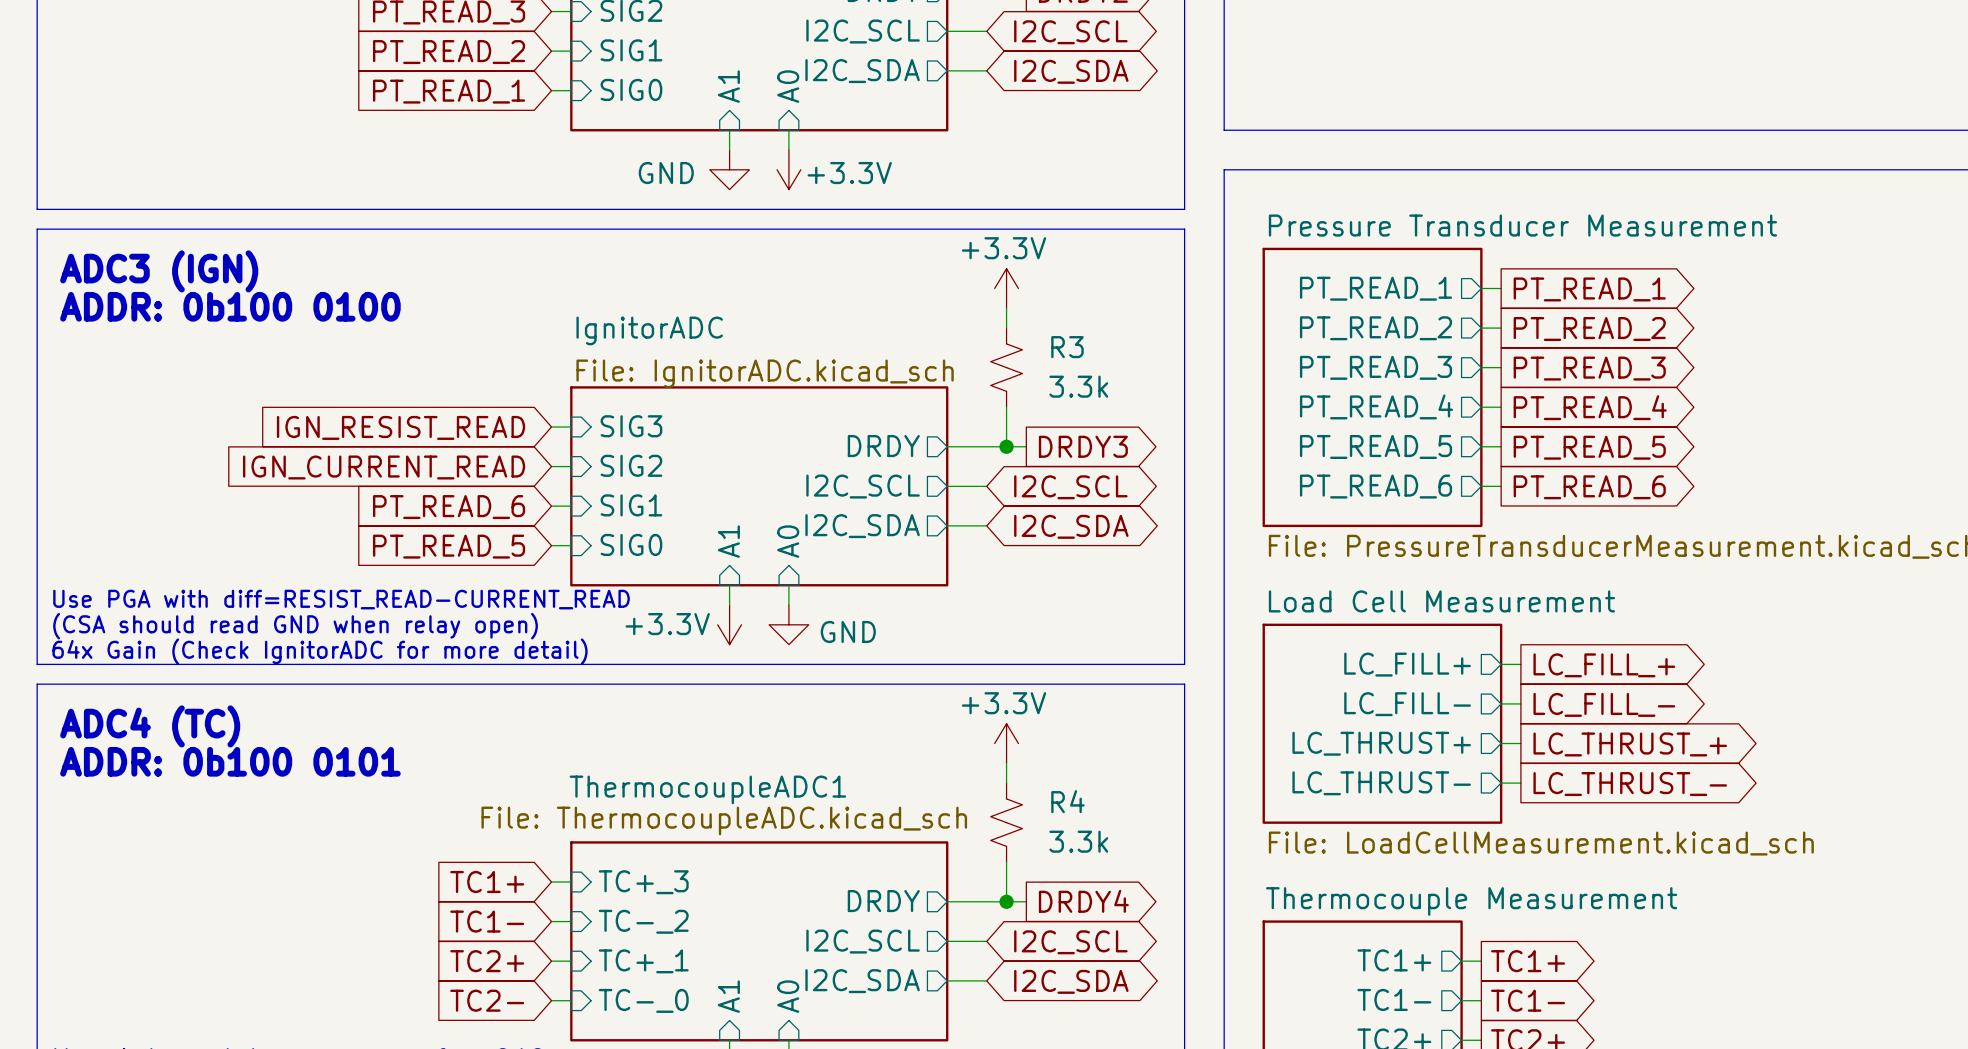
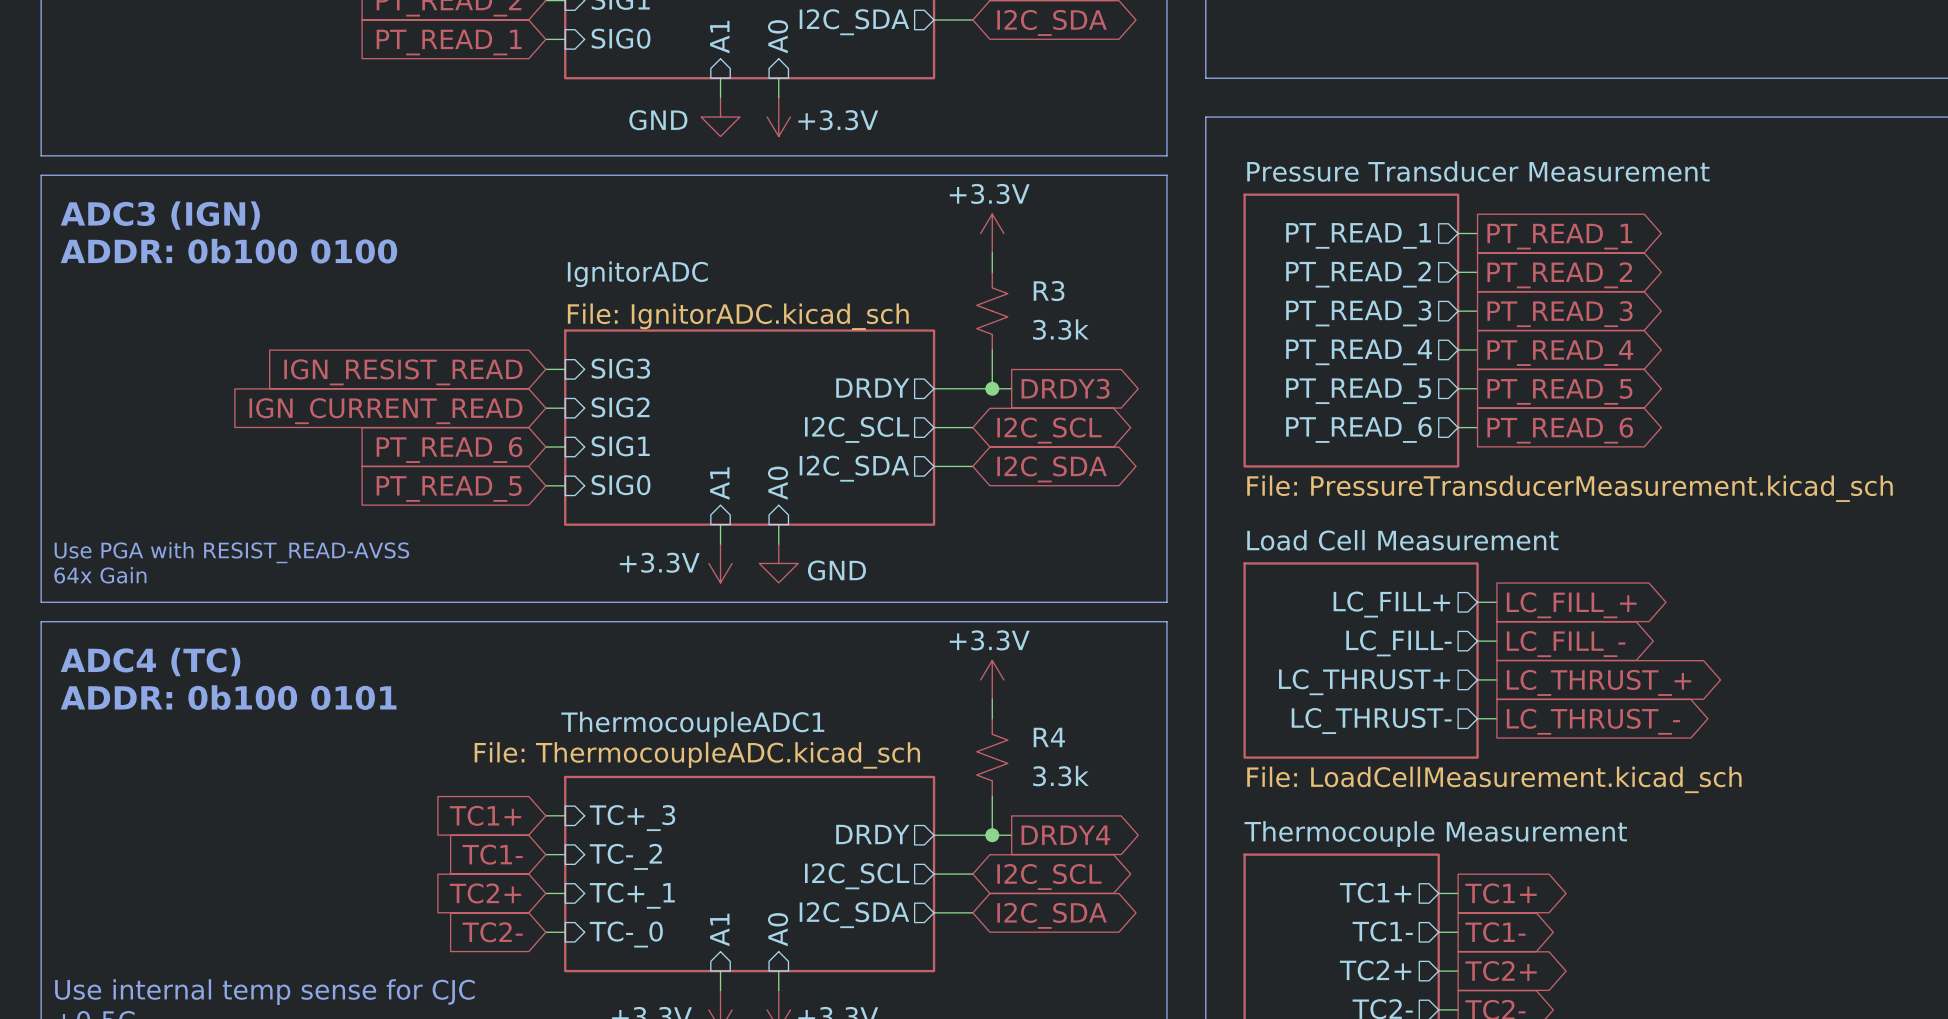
text: Use PGA with diff=RESIST_READ-CURRENT_READ (341, 599) -> Use PGA with RESIST_READ-AVSS (231, 552)
text: (CSA should read GND when relay open) (295, 626) -> none
text: none -> 64x Gain (100, 575)
text: 64x Gain (Check IgnitorADC for more detail) (320, 651) -> none

